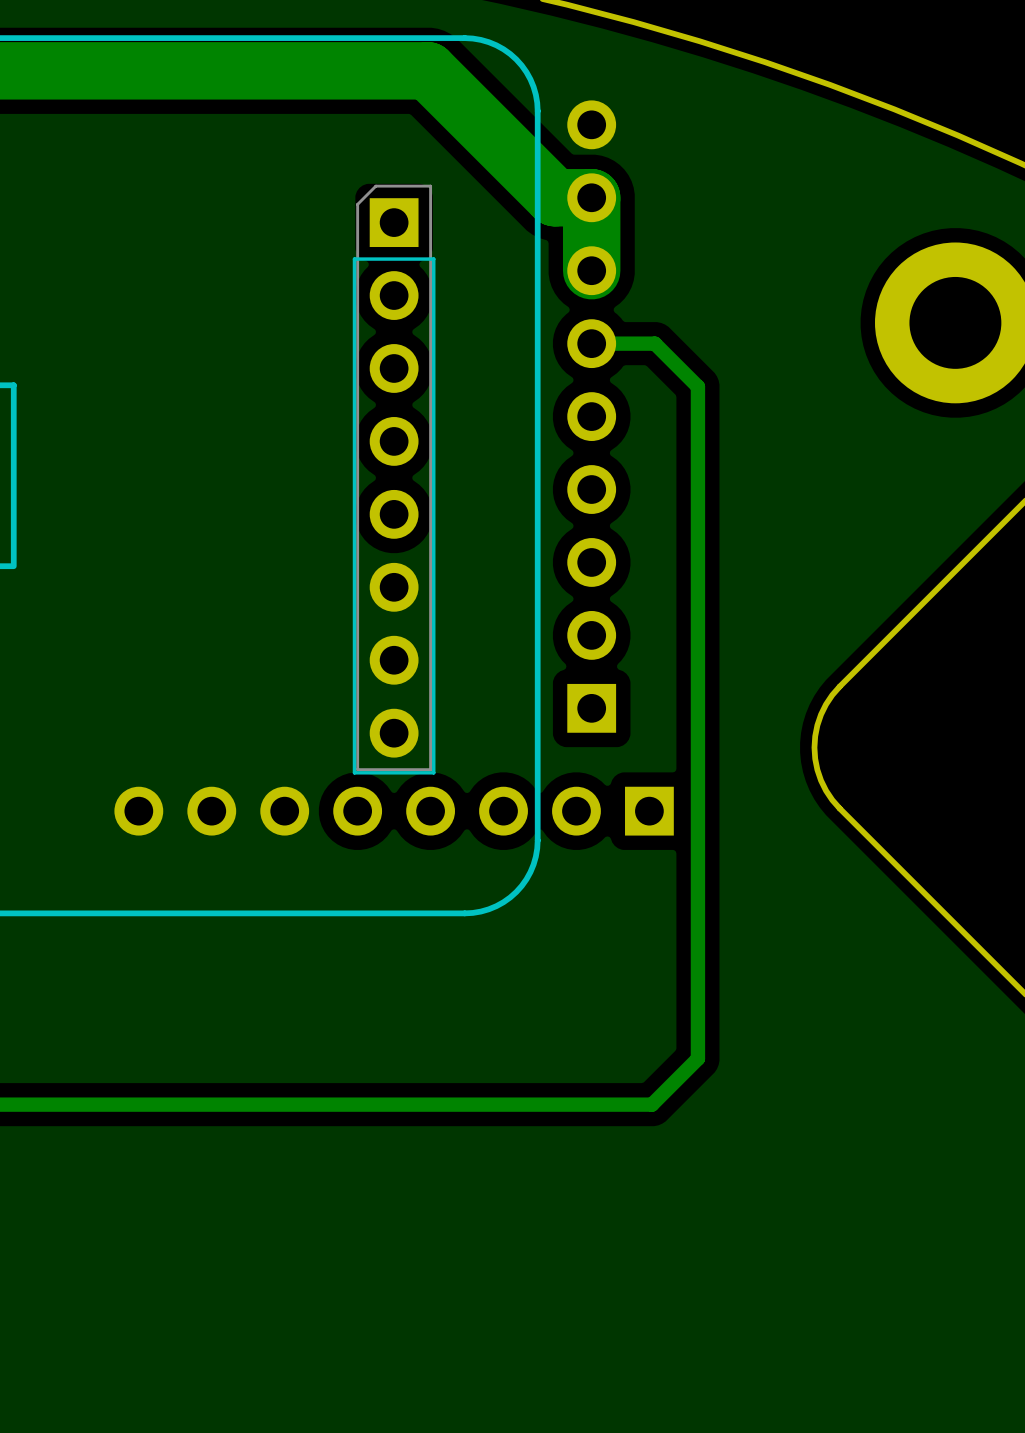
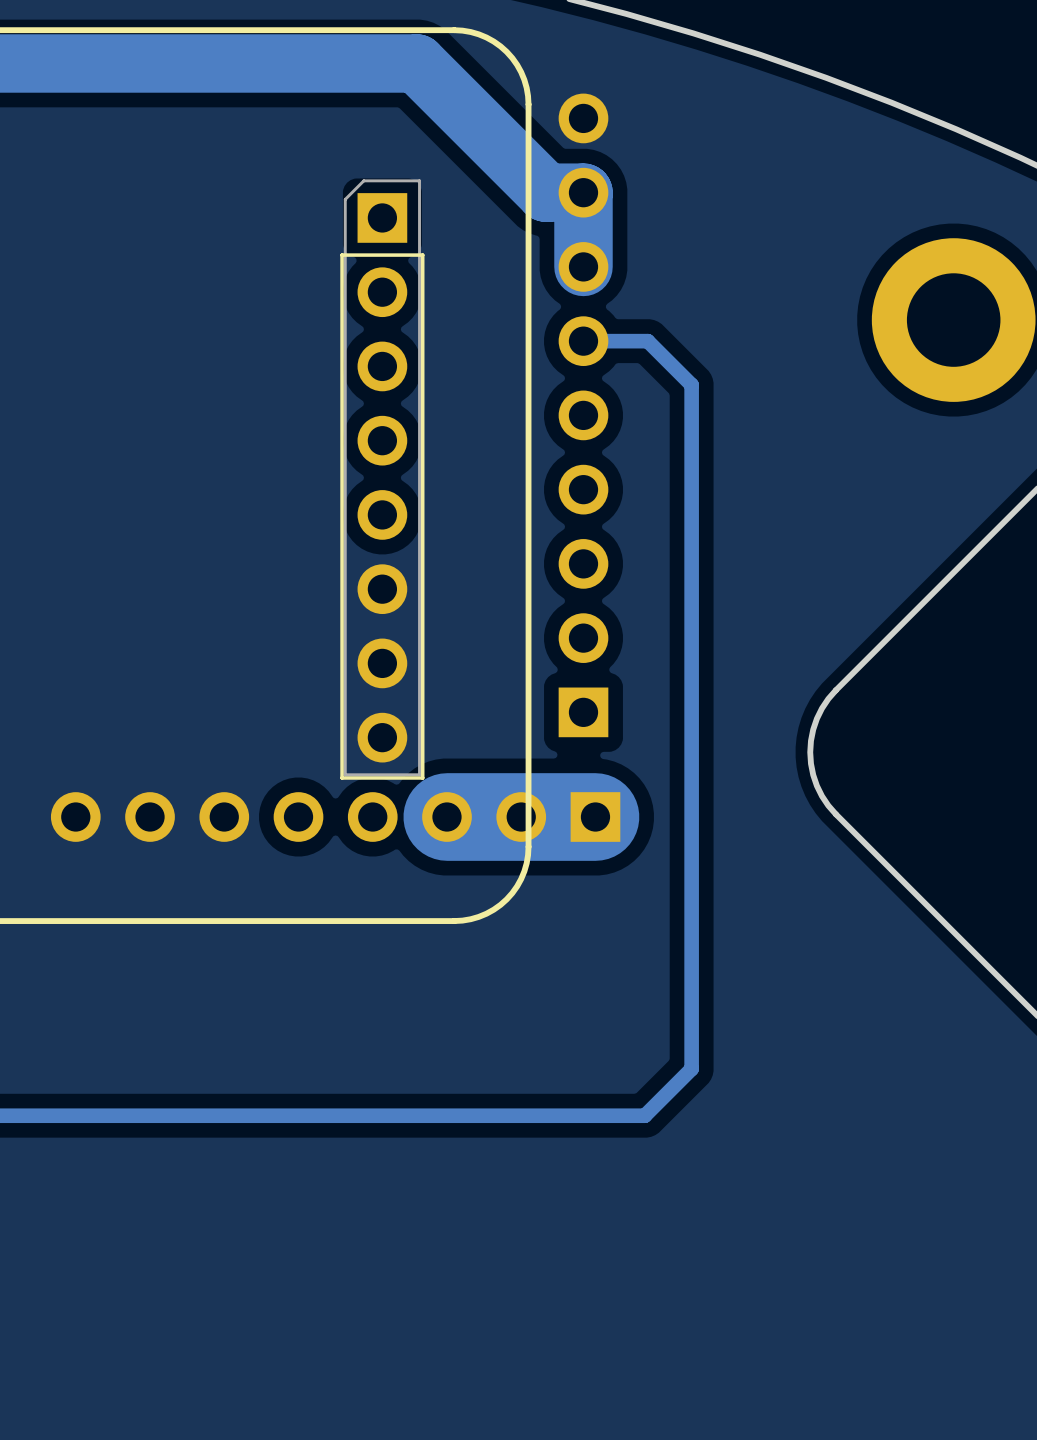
part position: (394, 811) -> (335, 817)
track: none -> (595, 817) (447, 817)

